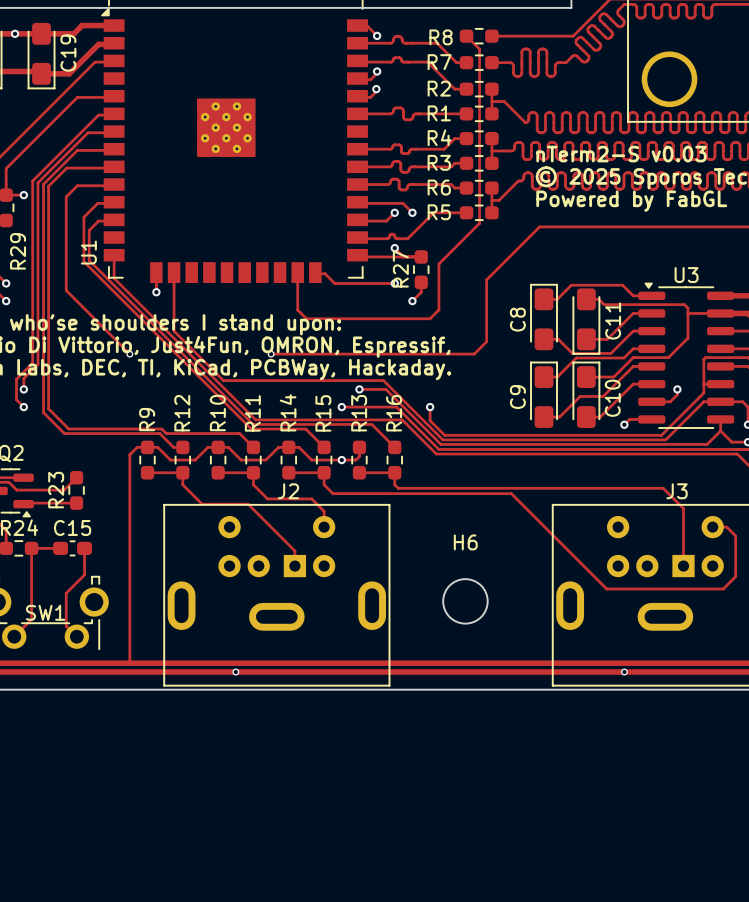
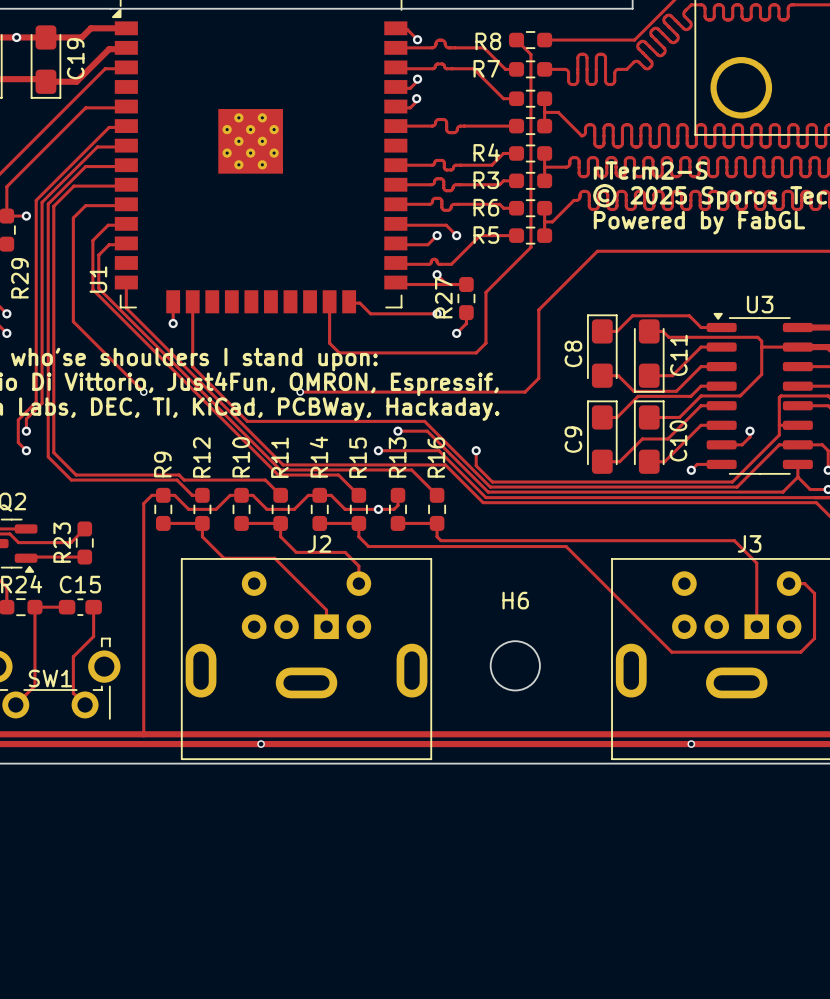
R2 name: R2 (439, 88) -> none
R1 name: R1 (439, 113) -> none
text: nTerm2-S v0.03 (621, 154) -> nTerm2-S (650, 170)

